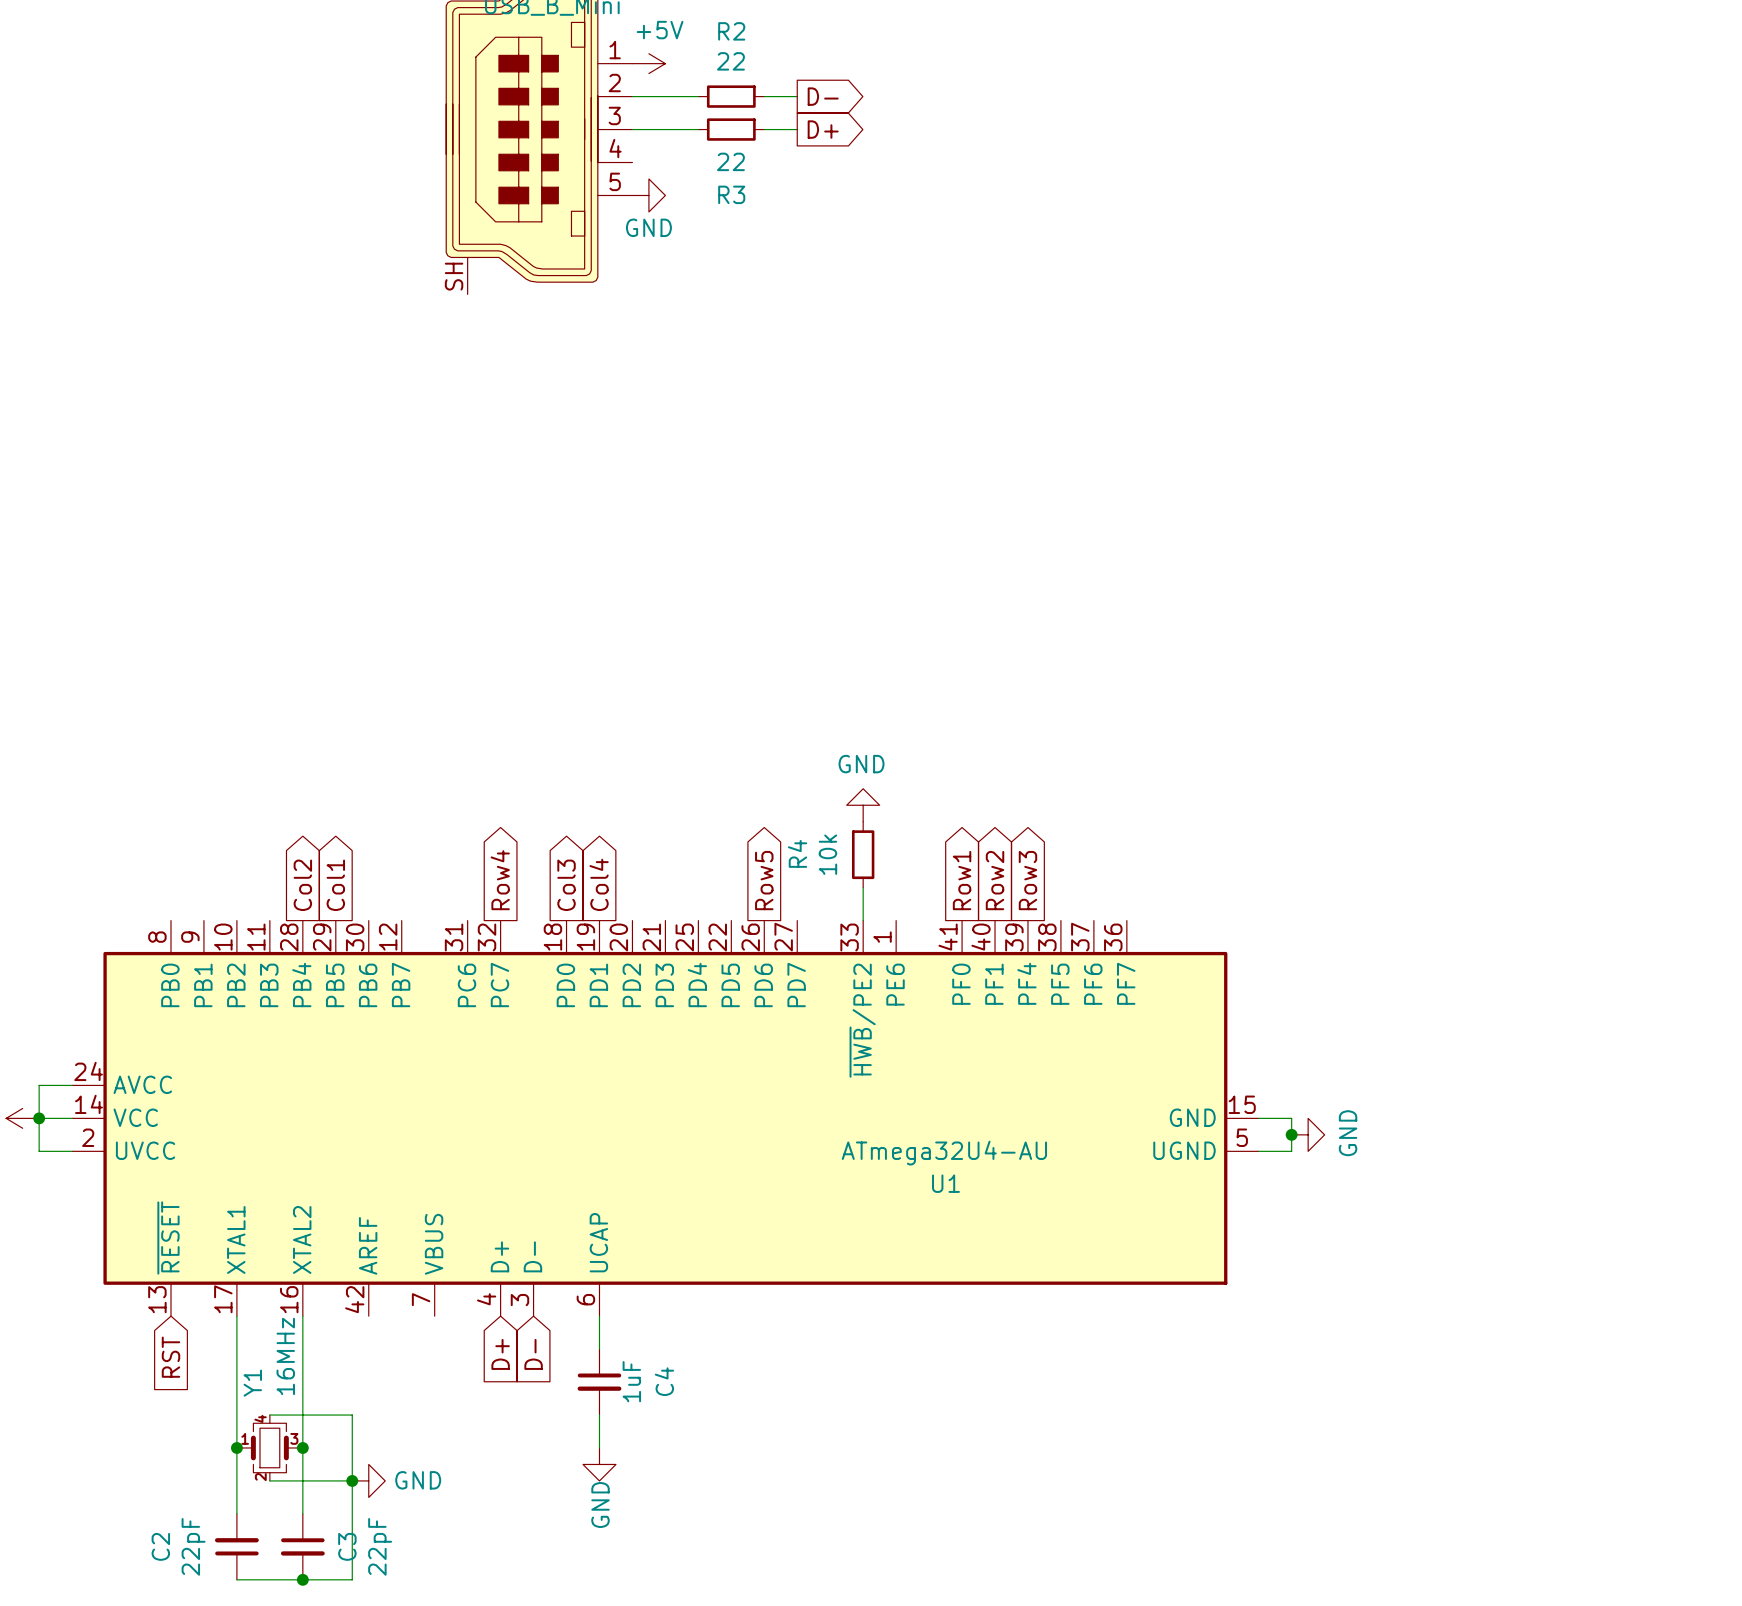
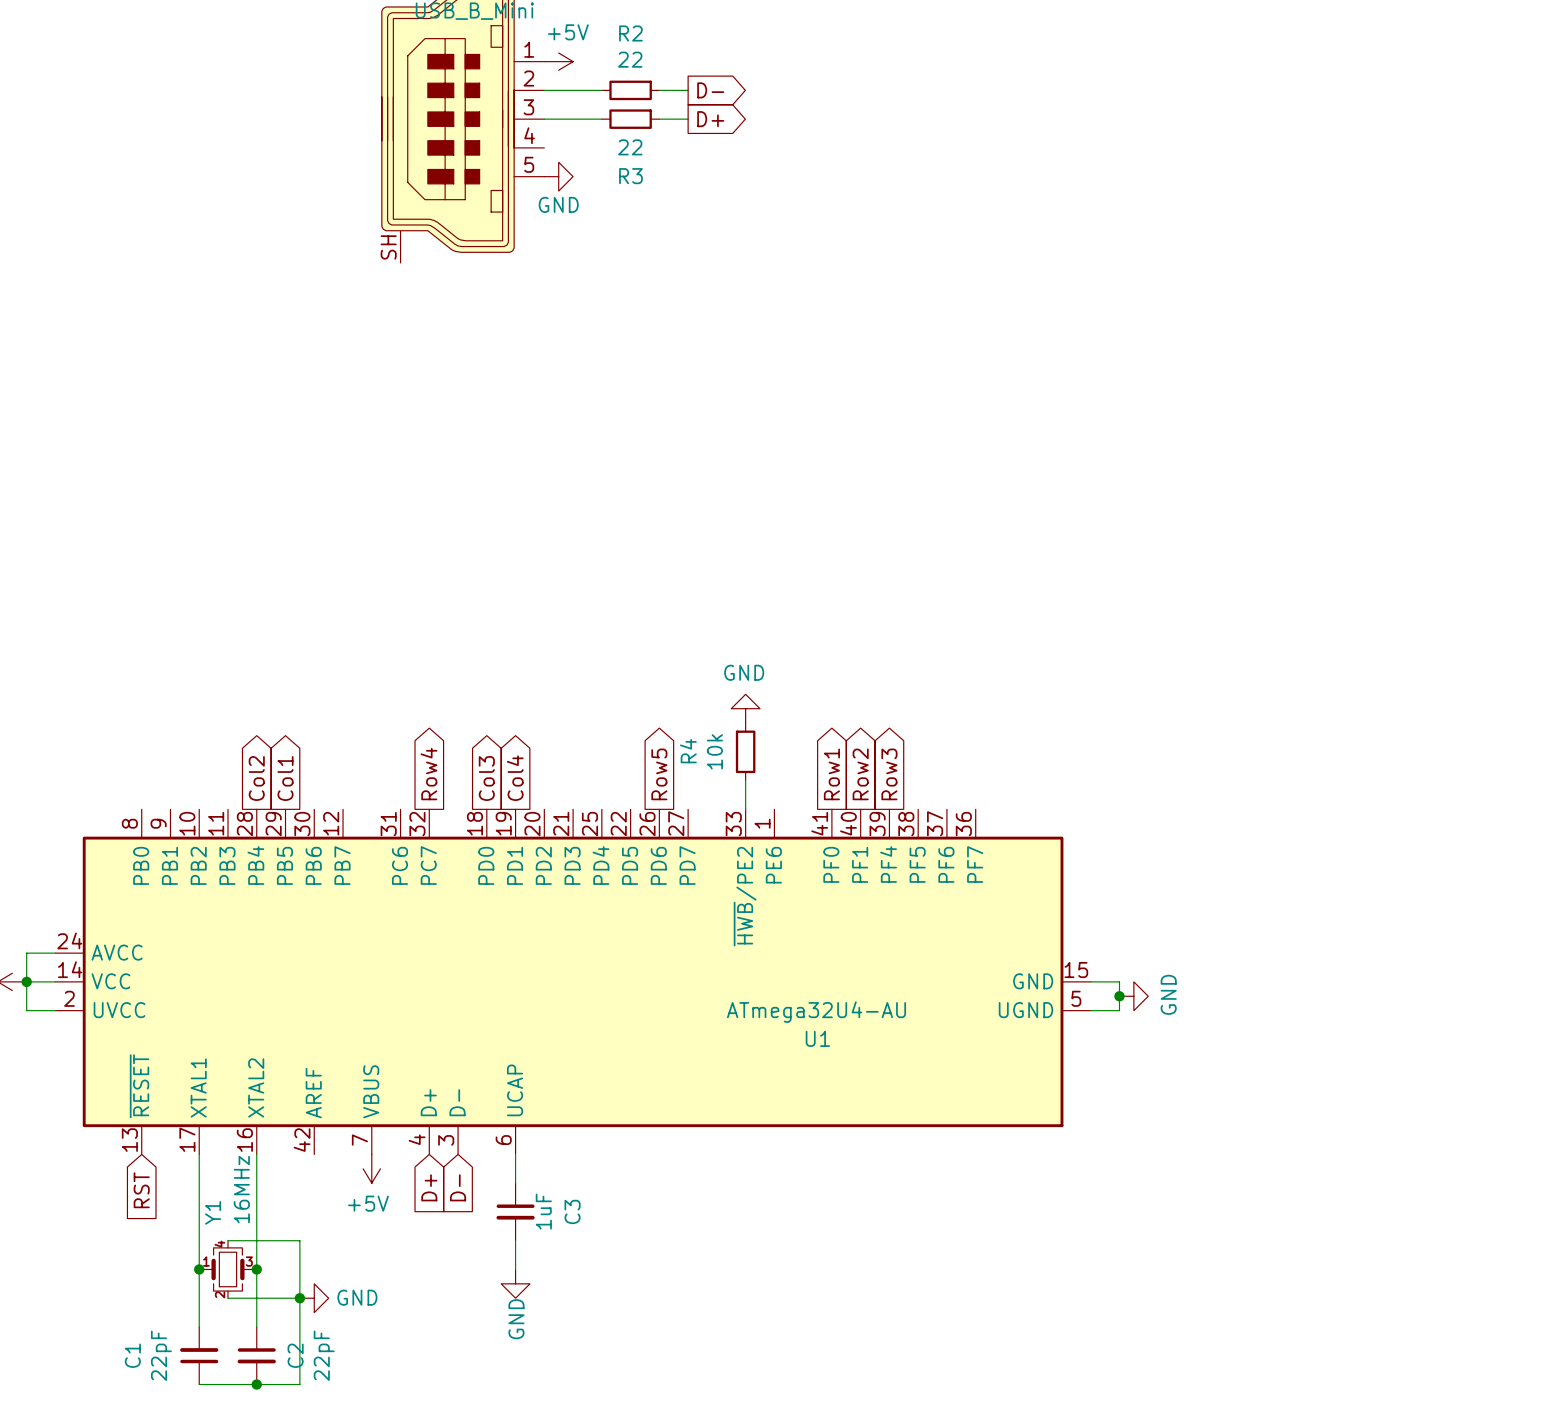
power symbol: none -> +5V (371, 1168)
C4 name: C4 (664, 1381) -> C3 (572, 1211)
C2 name: C2 (160, 1546) -> C1 (132, 1355)
C3 name: C3 (347, 1546) -> C2 (295, 1355)

